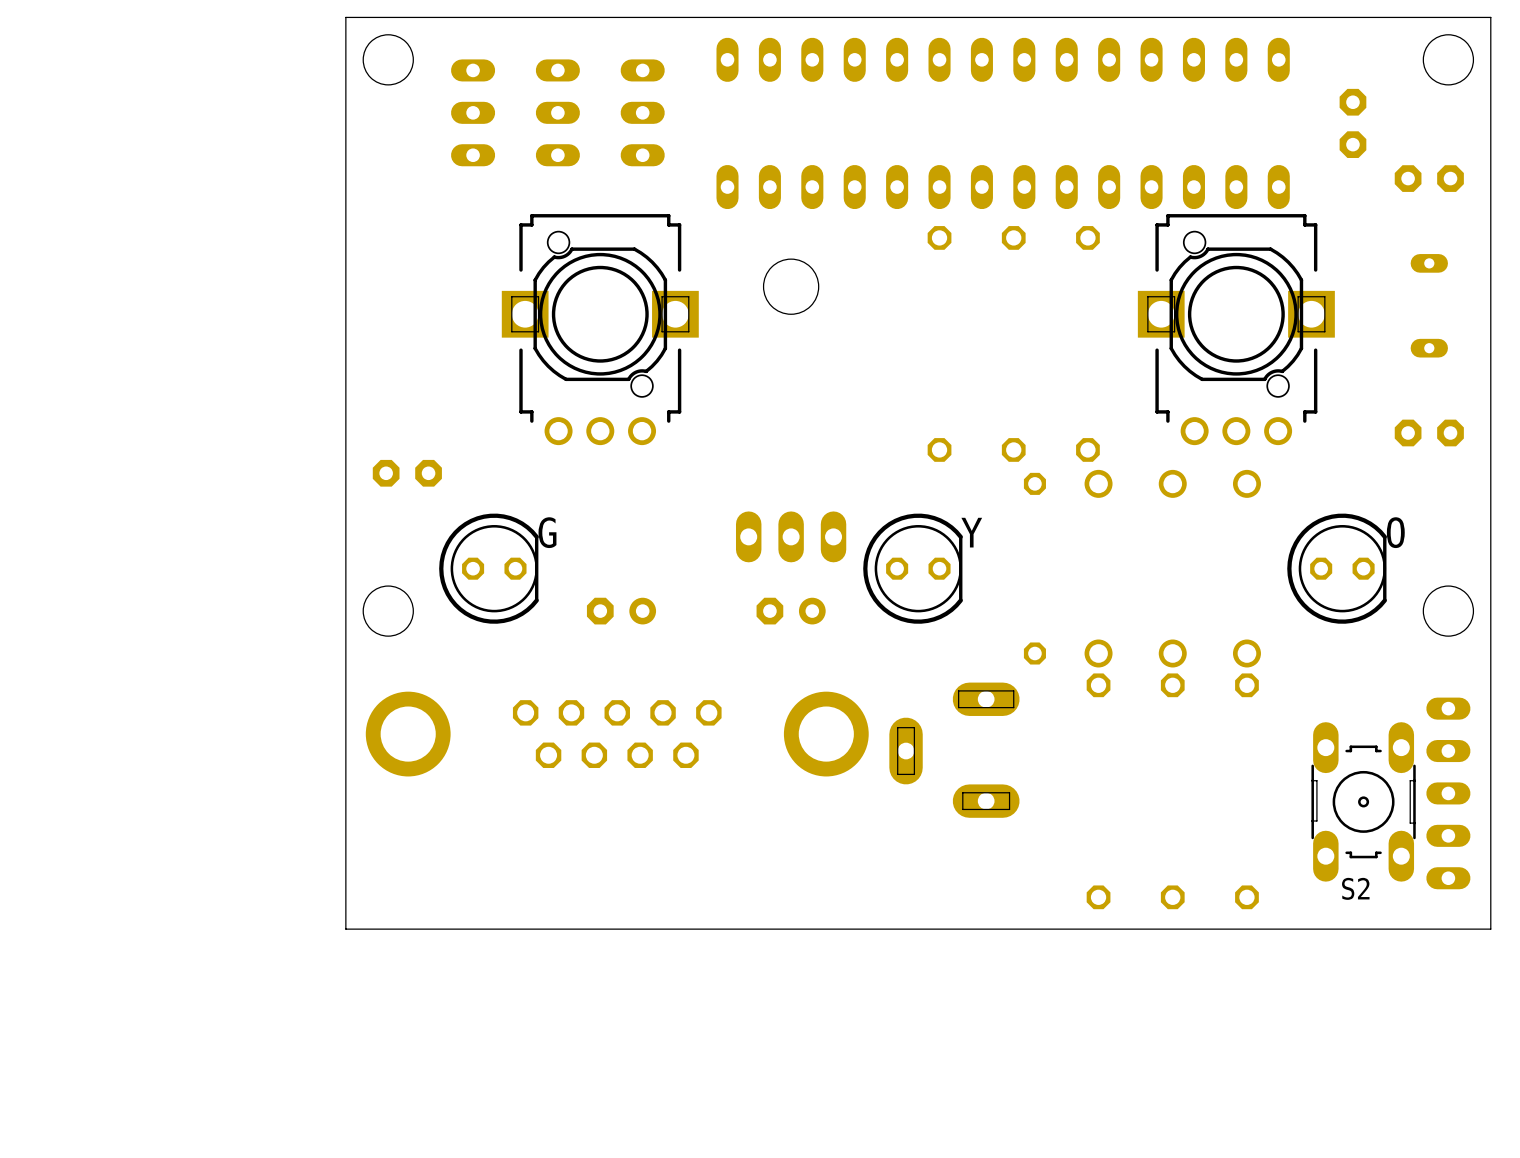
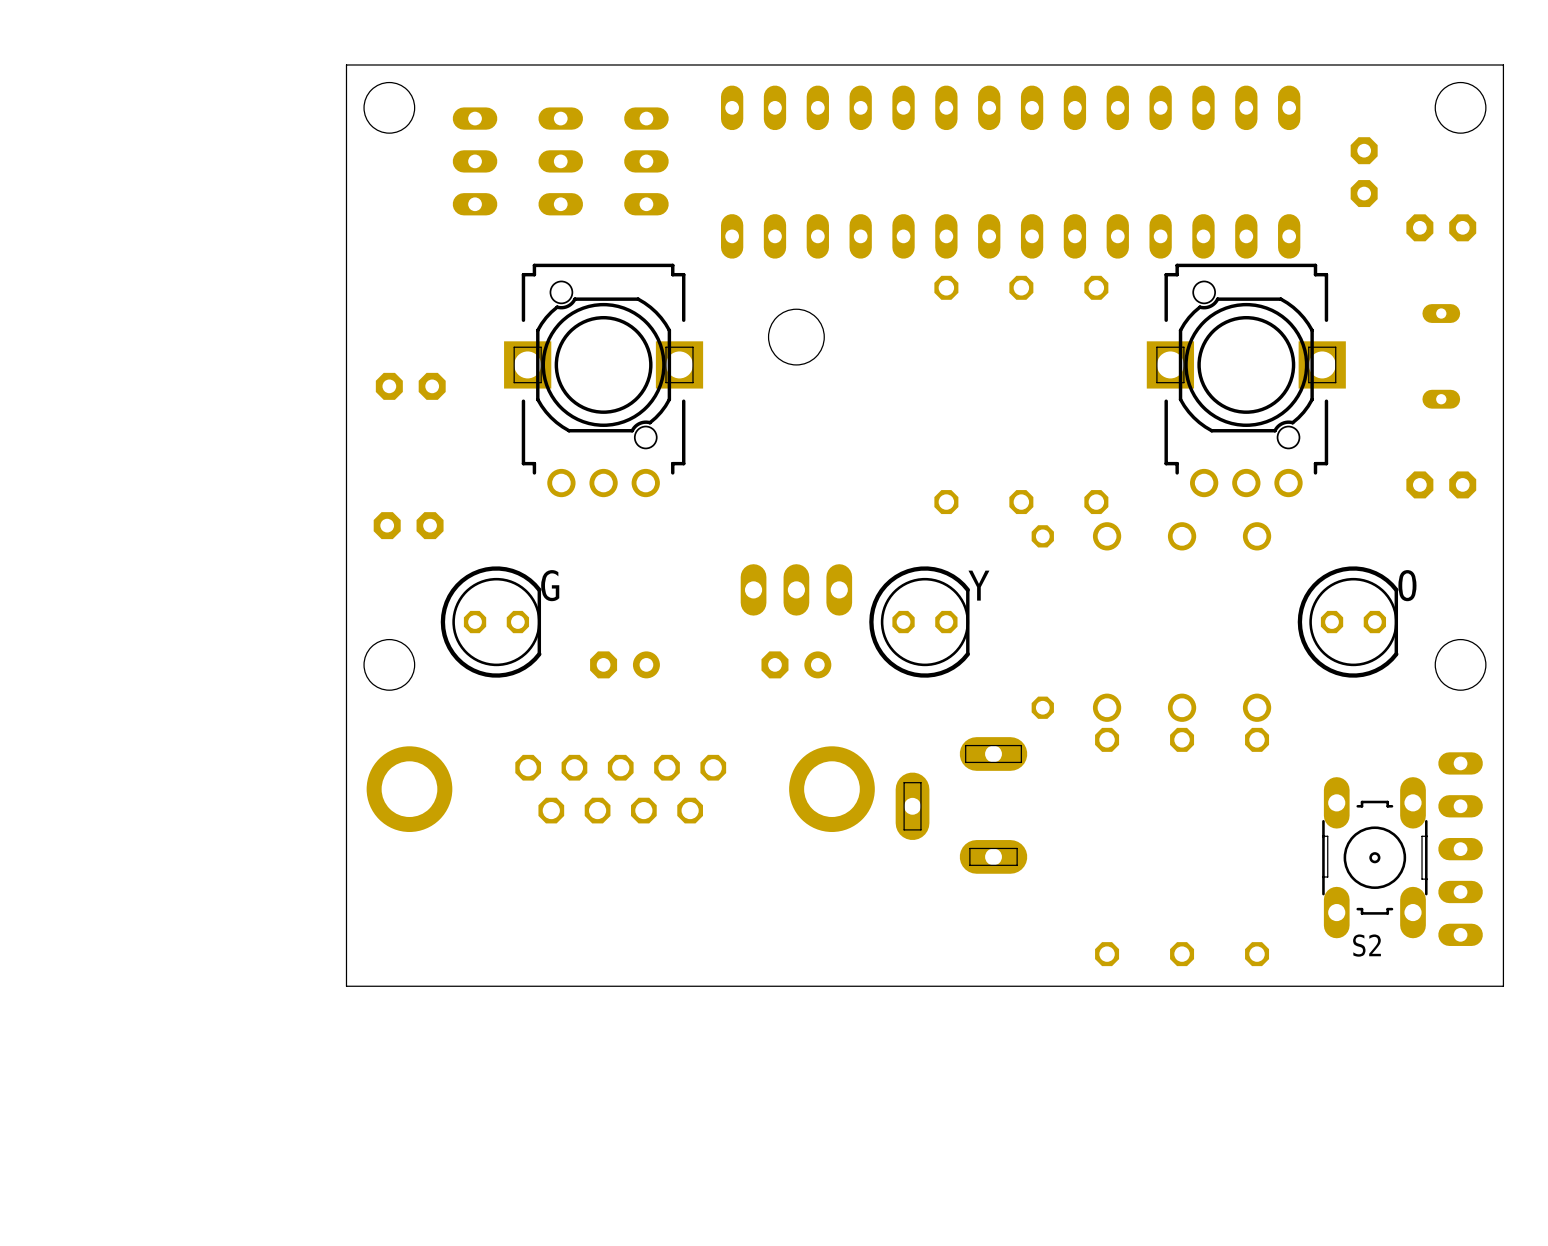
part: none -> (410, 386)

